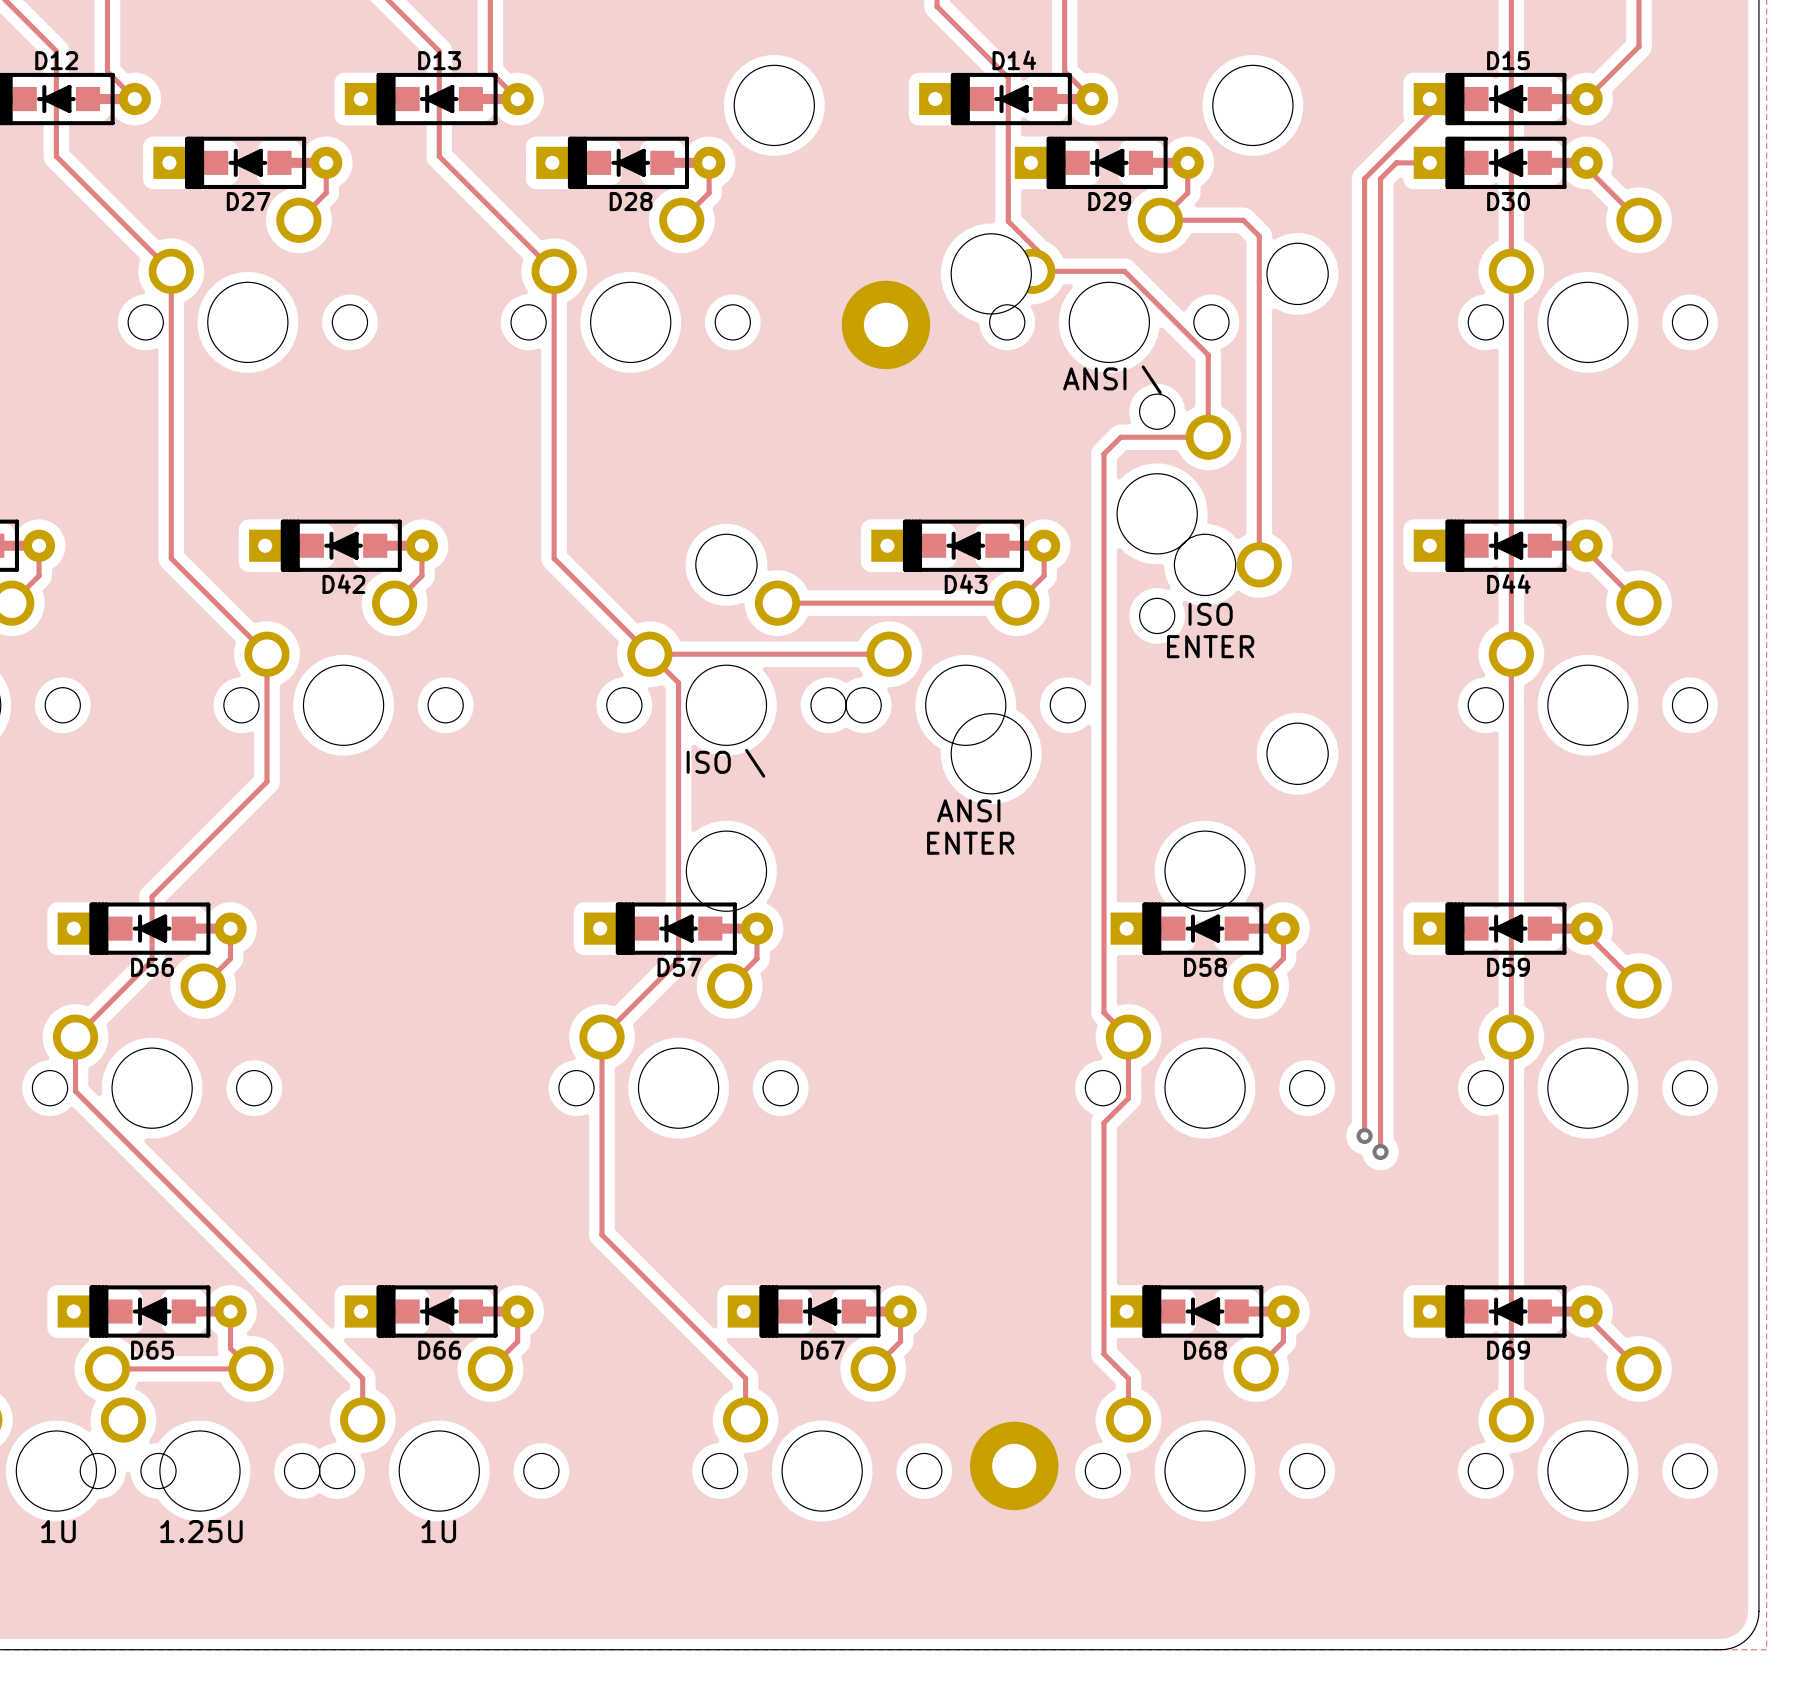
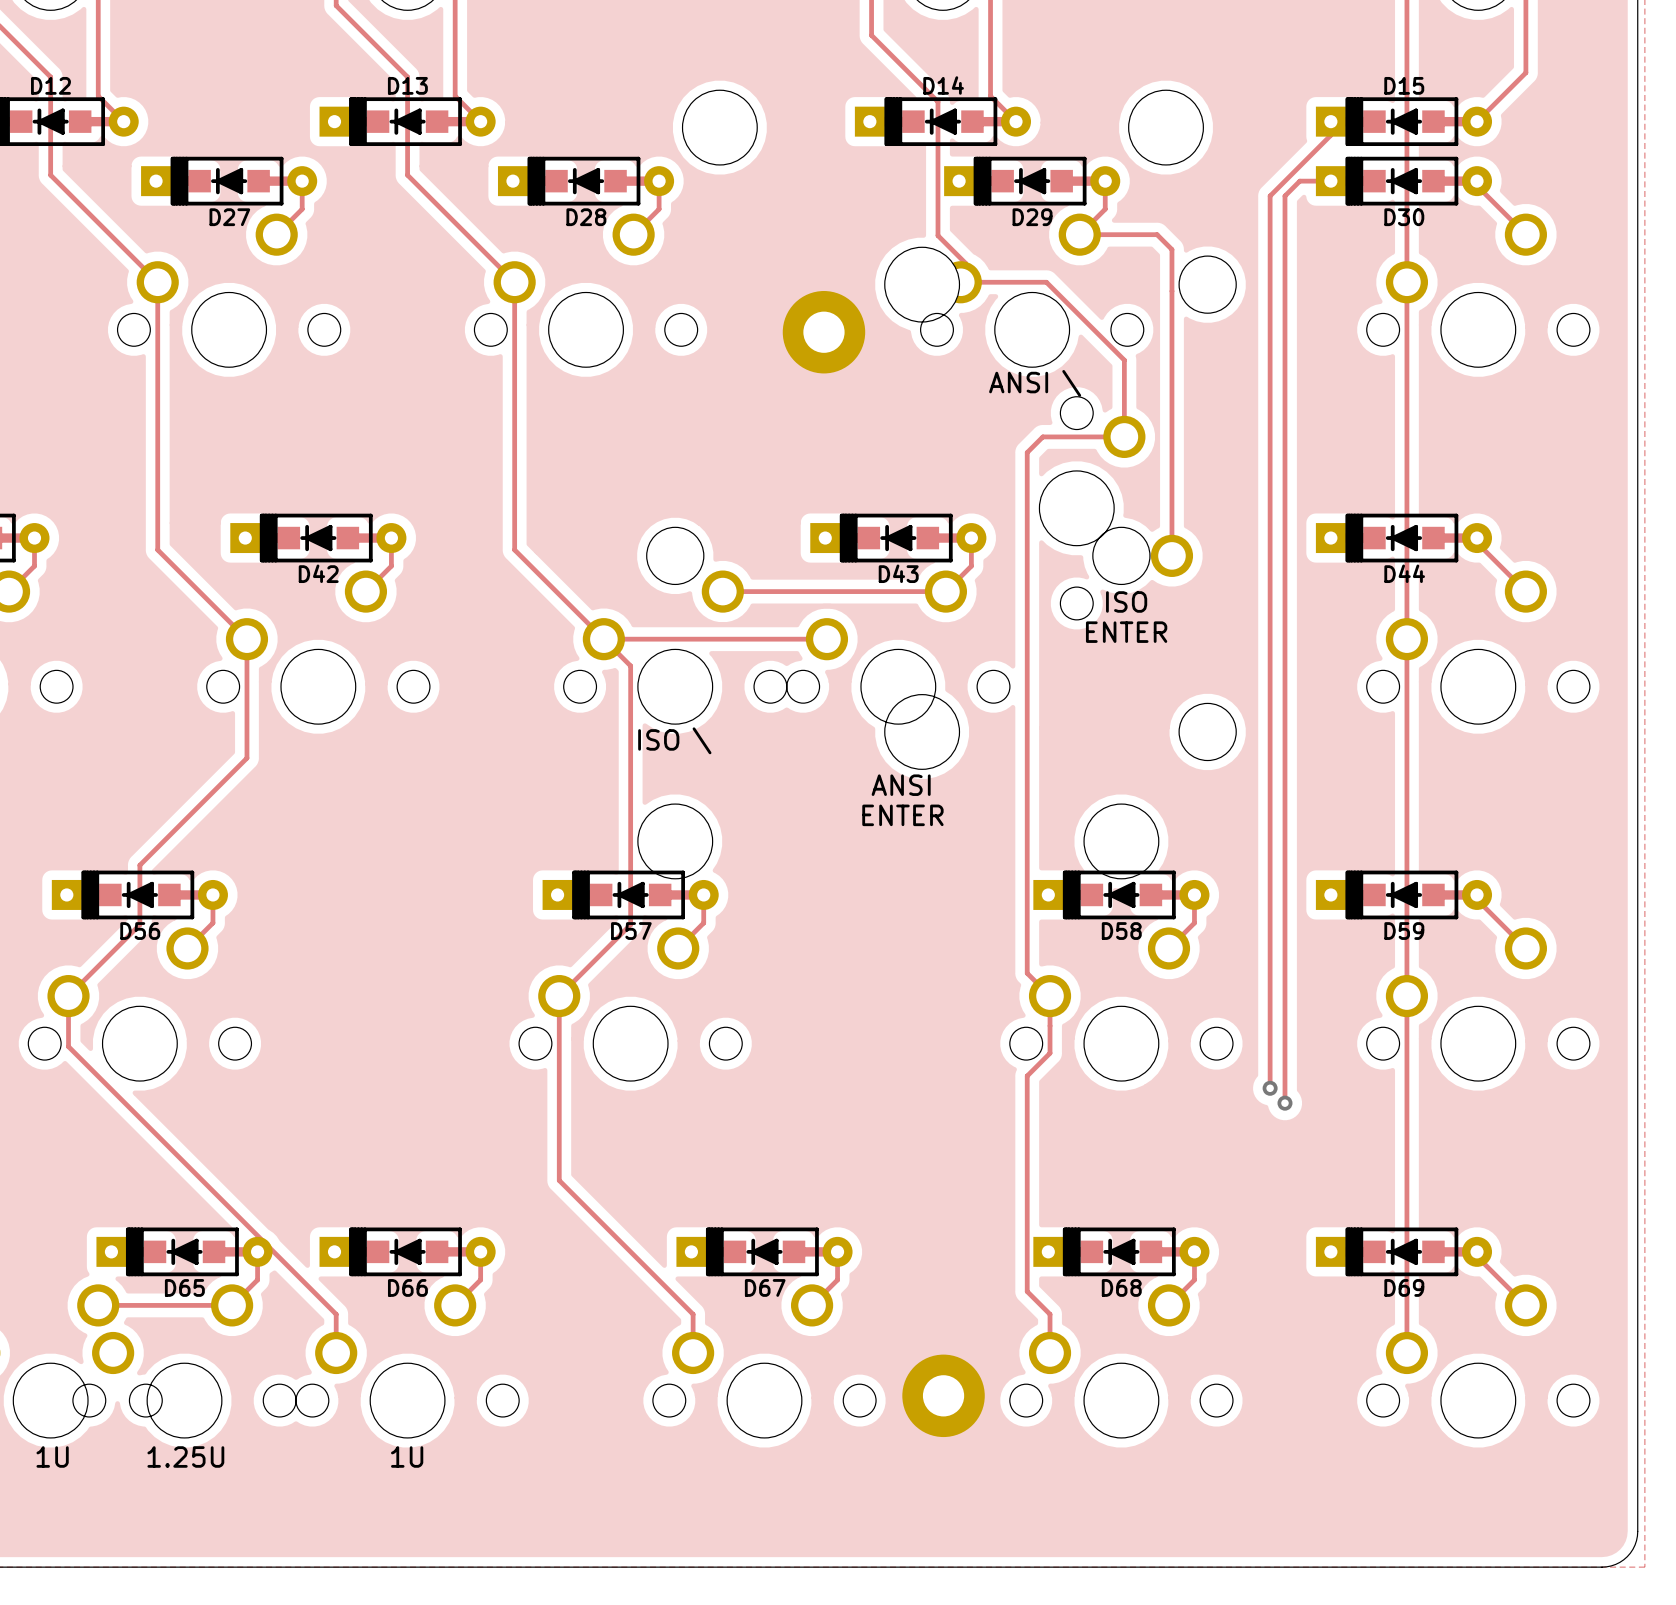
D65 position: (152, 1311) -> (184, 1251)
track: (230, 1311) (230, 1348) (251, 1368) -> (257, 1251) (257, 1279) (232, 1305)

